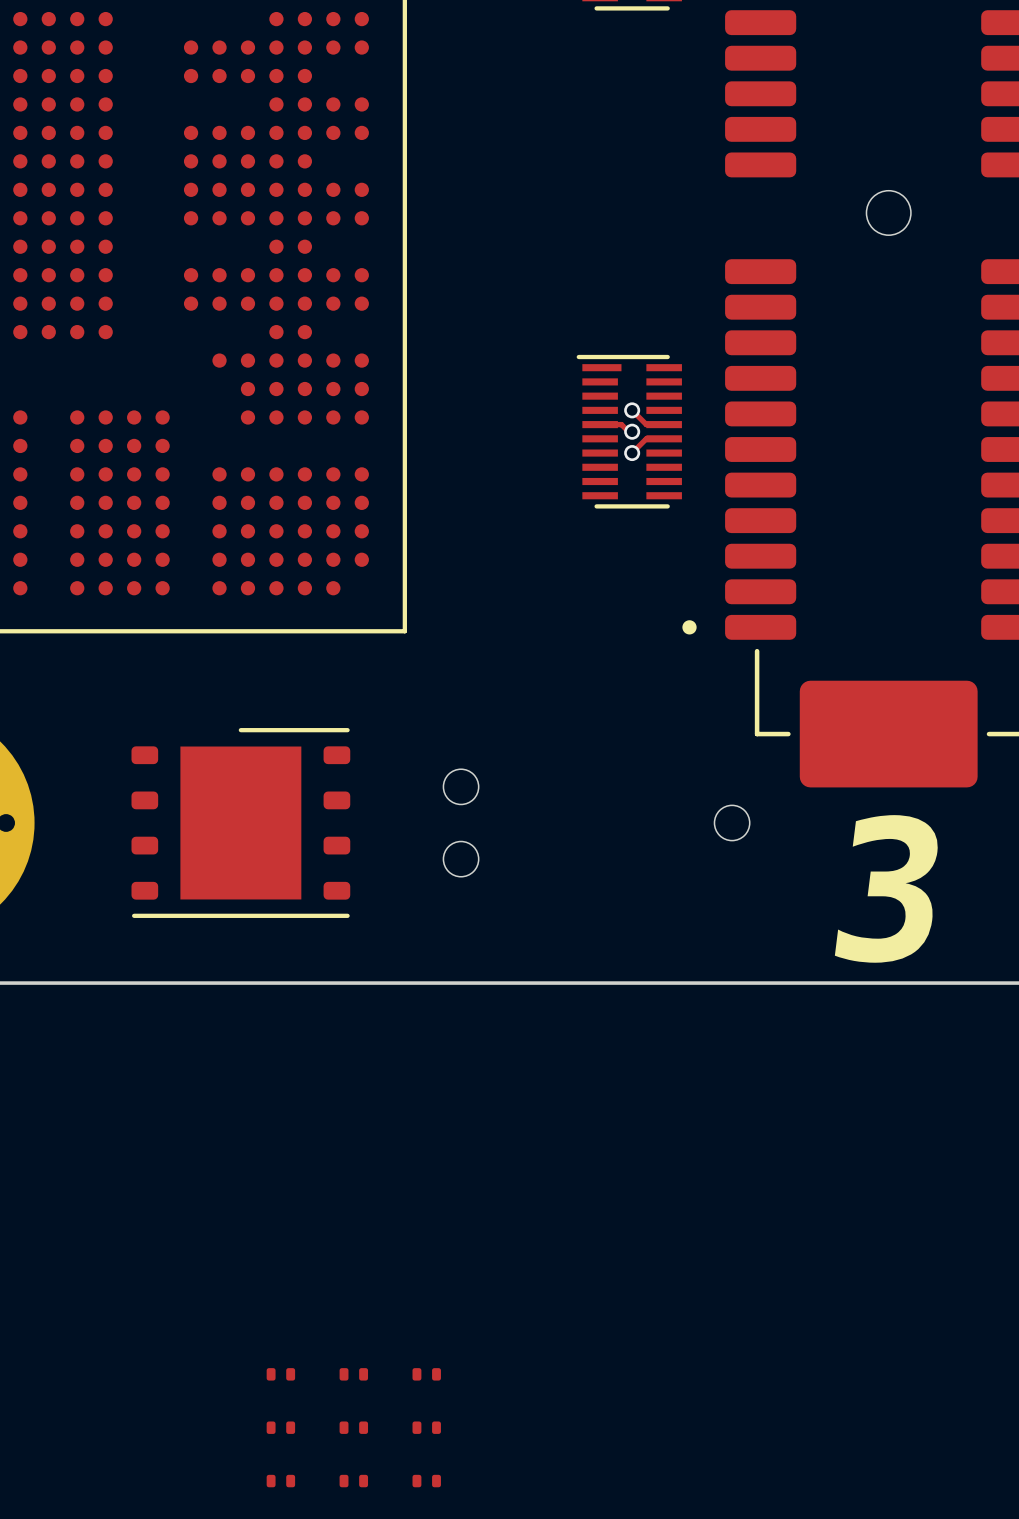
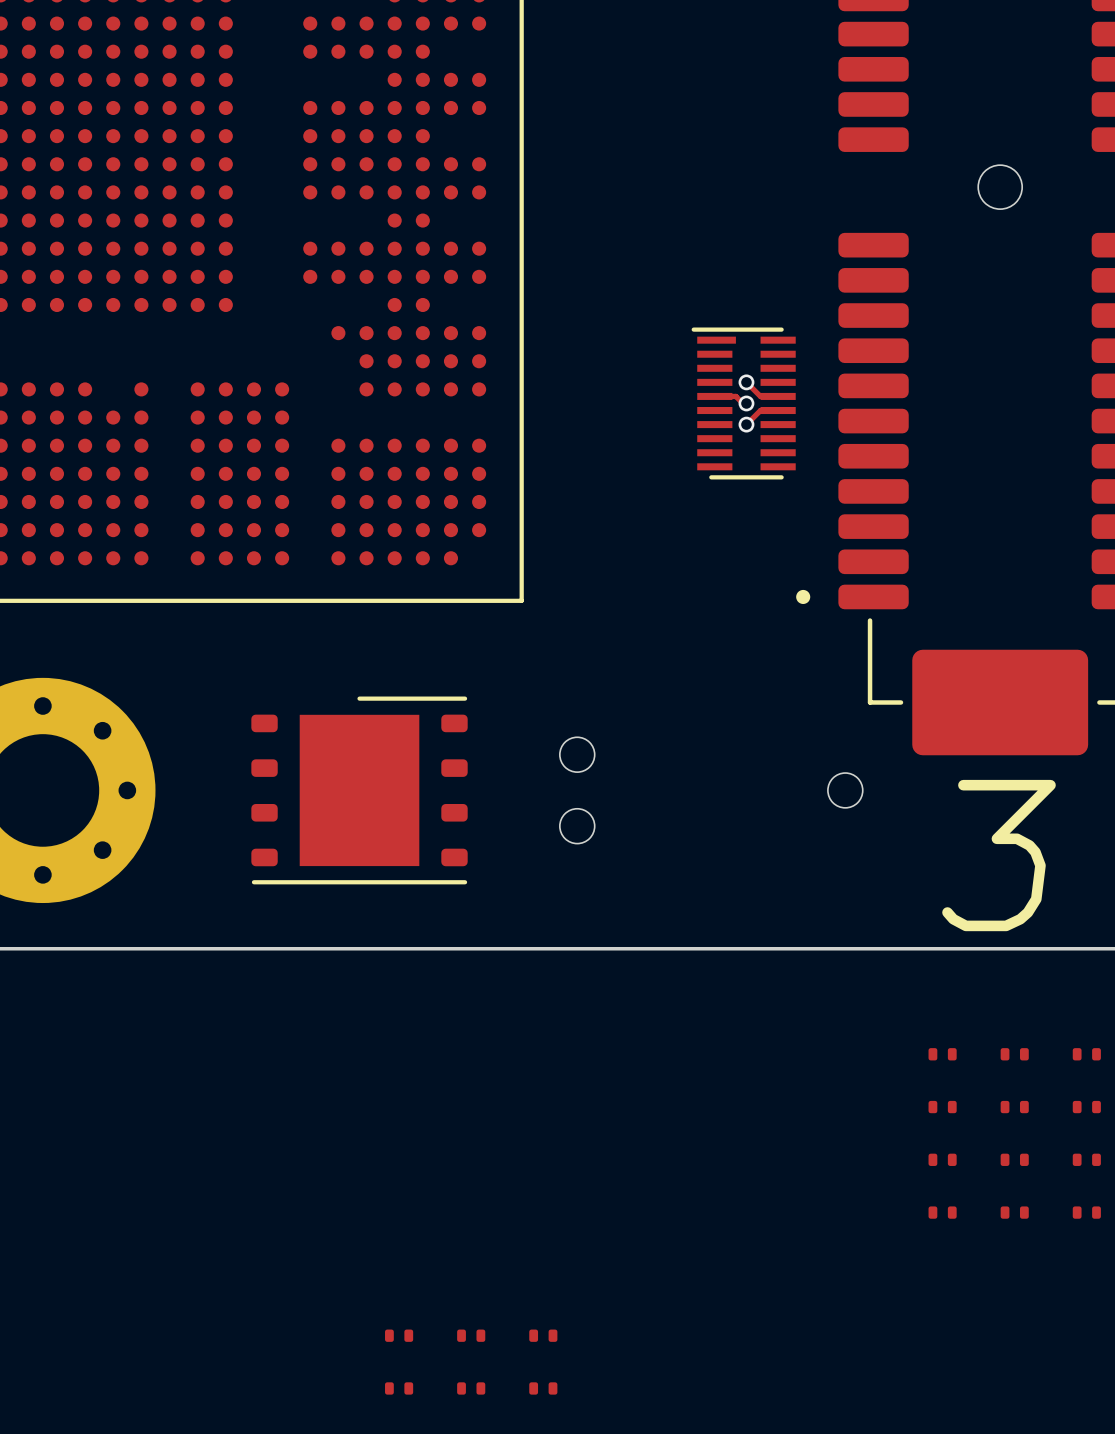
part: none -> (942, 1054)
part: none -> (1014, 1054)
part: none -> (1086, 1054)
part: none -> (942, 1107)
part: none -> (1014, 1107)
part: none -> (1086, 1107)
part: none -> (942, 1159)
part: none -> (1014, 1159)
part: none -> (1086, 1159)
part: none -> (942, 1212)
part: none -> (1014, 1212)
part: none -> (1086, 1212)

